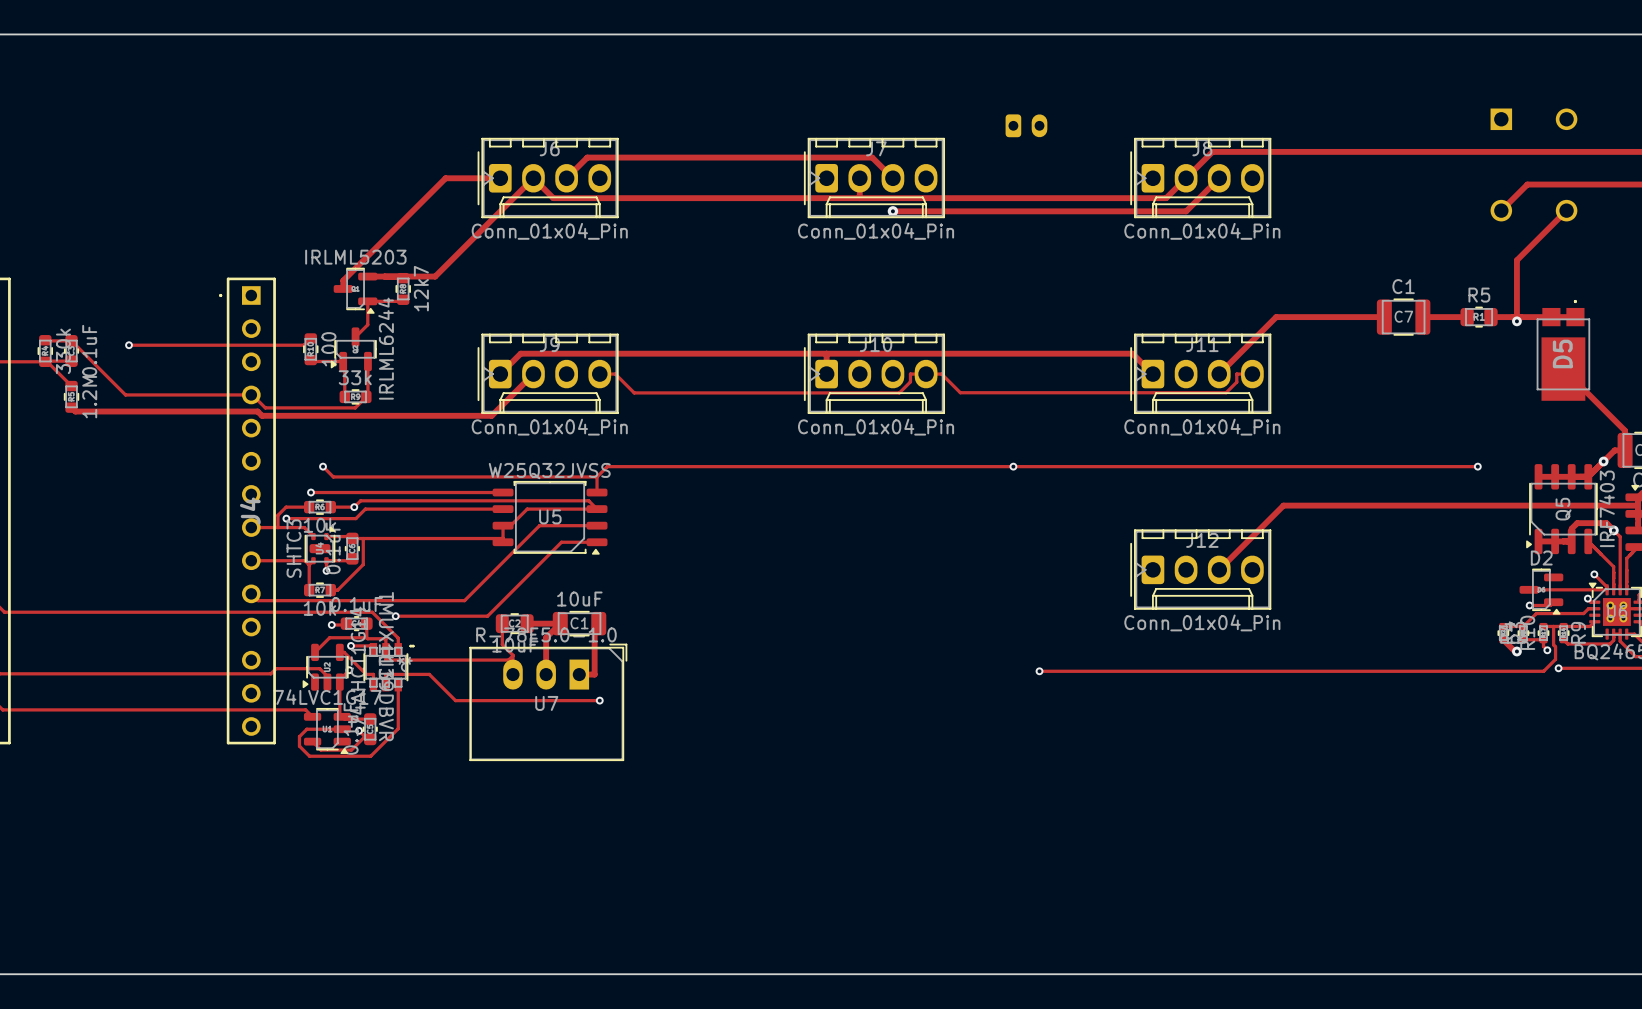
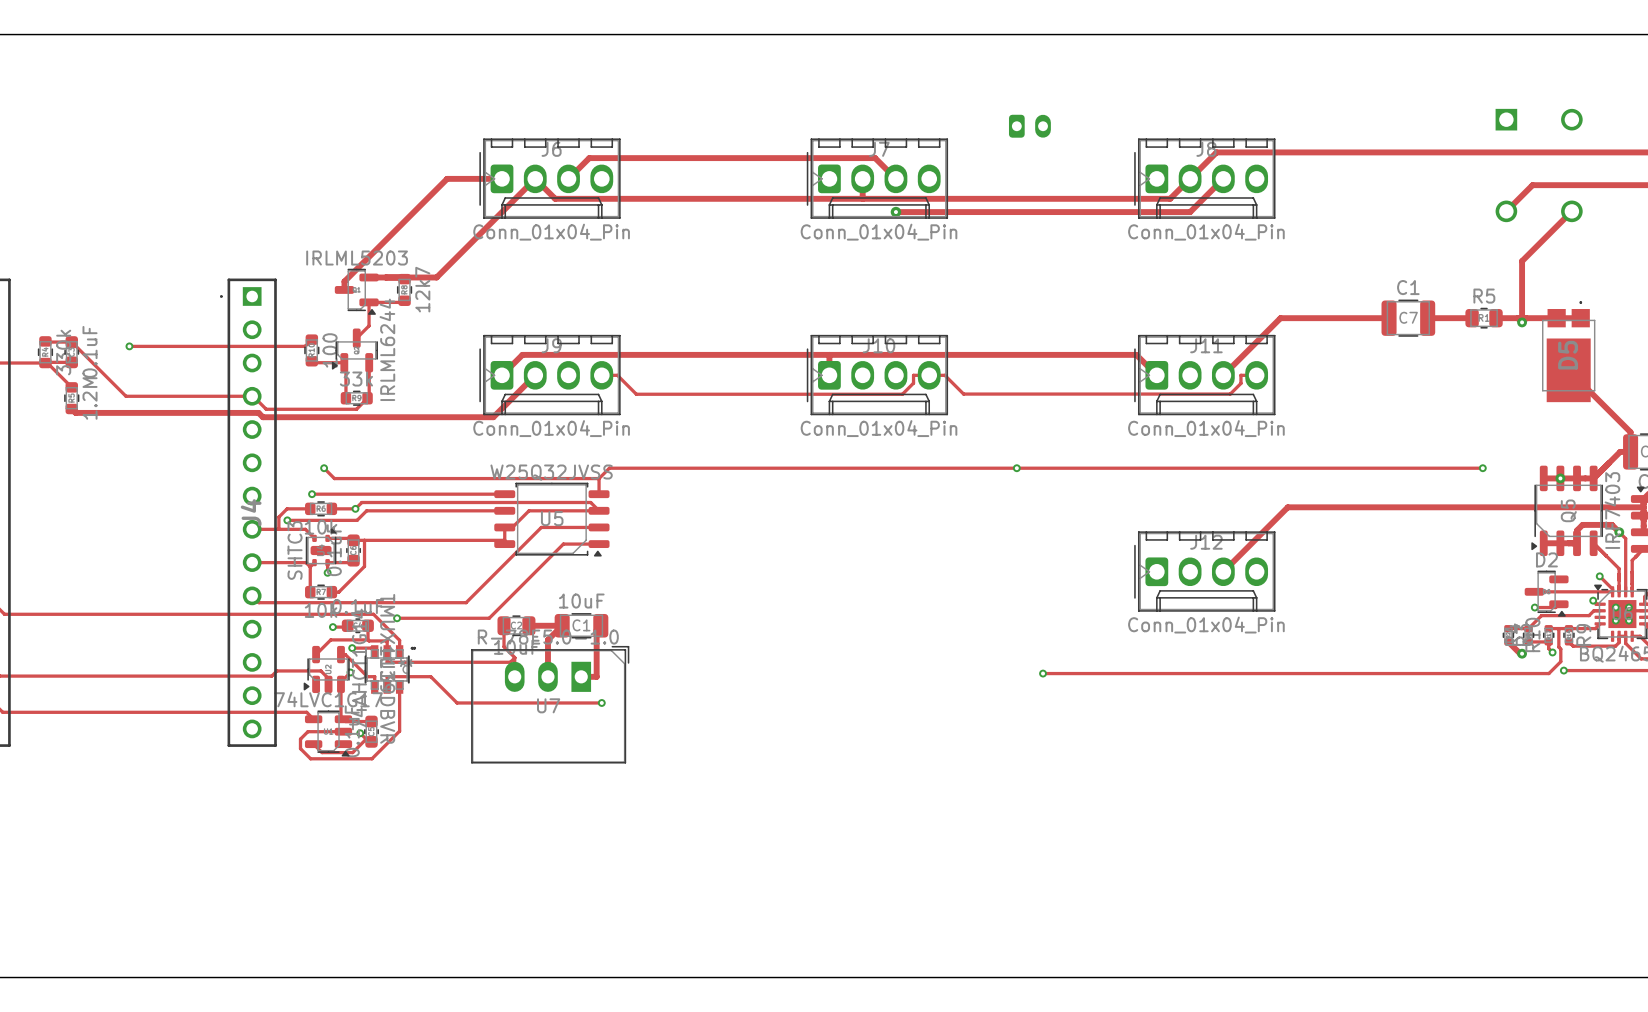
via position: (1603, 461) -> (1560, 478)

